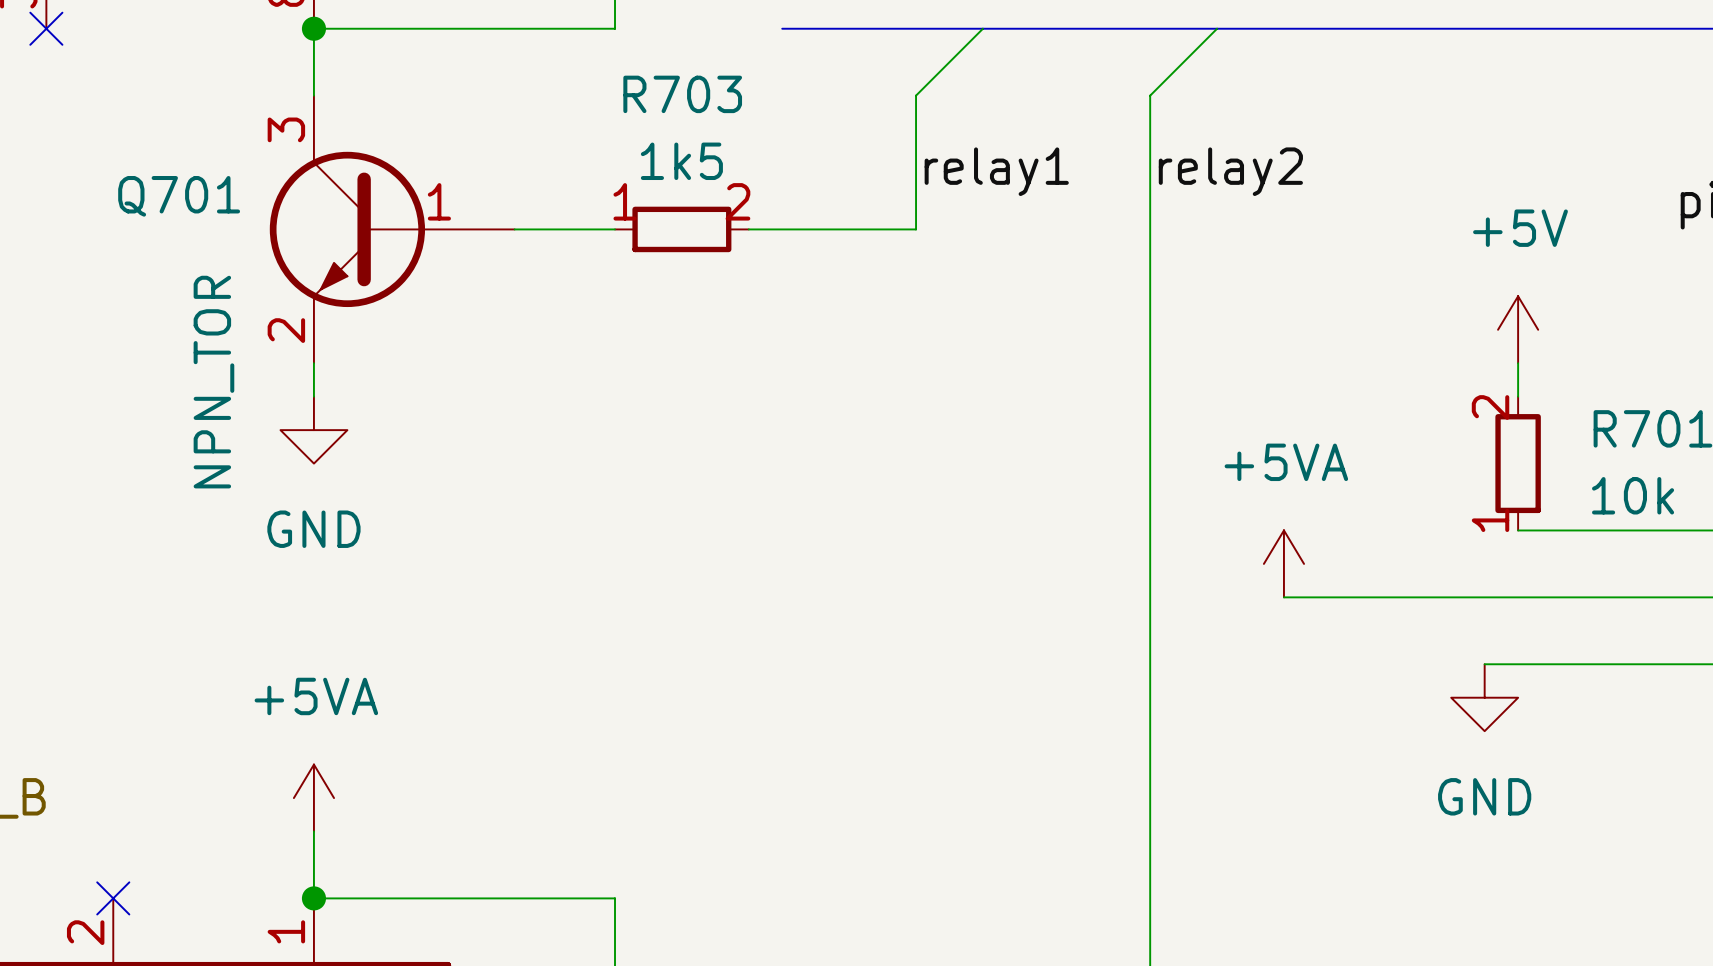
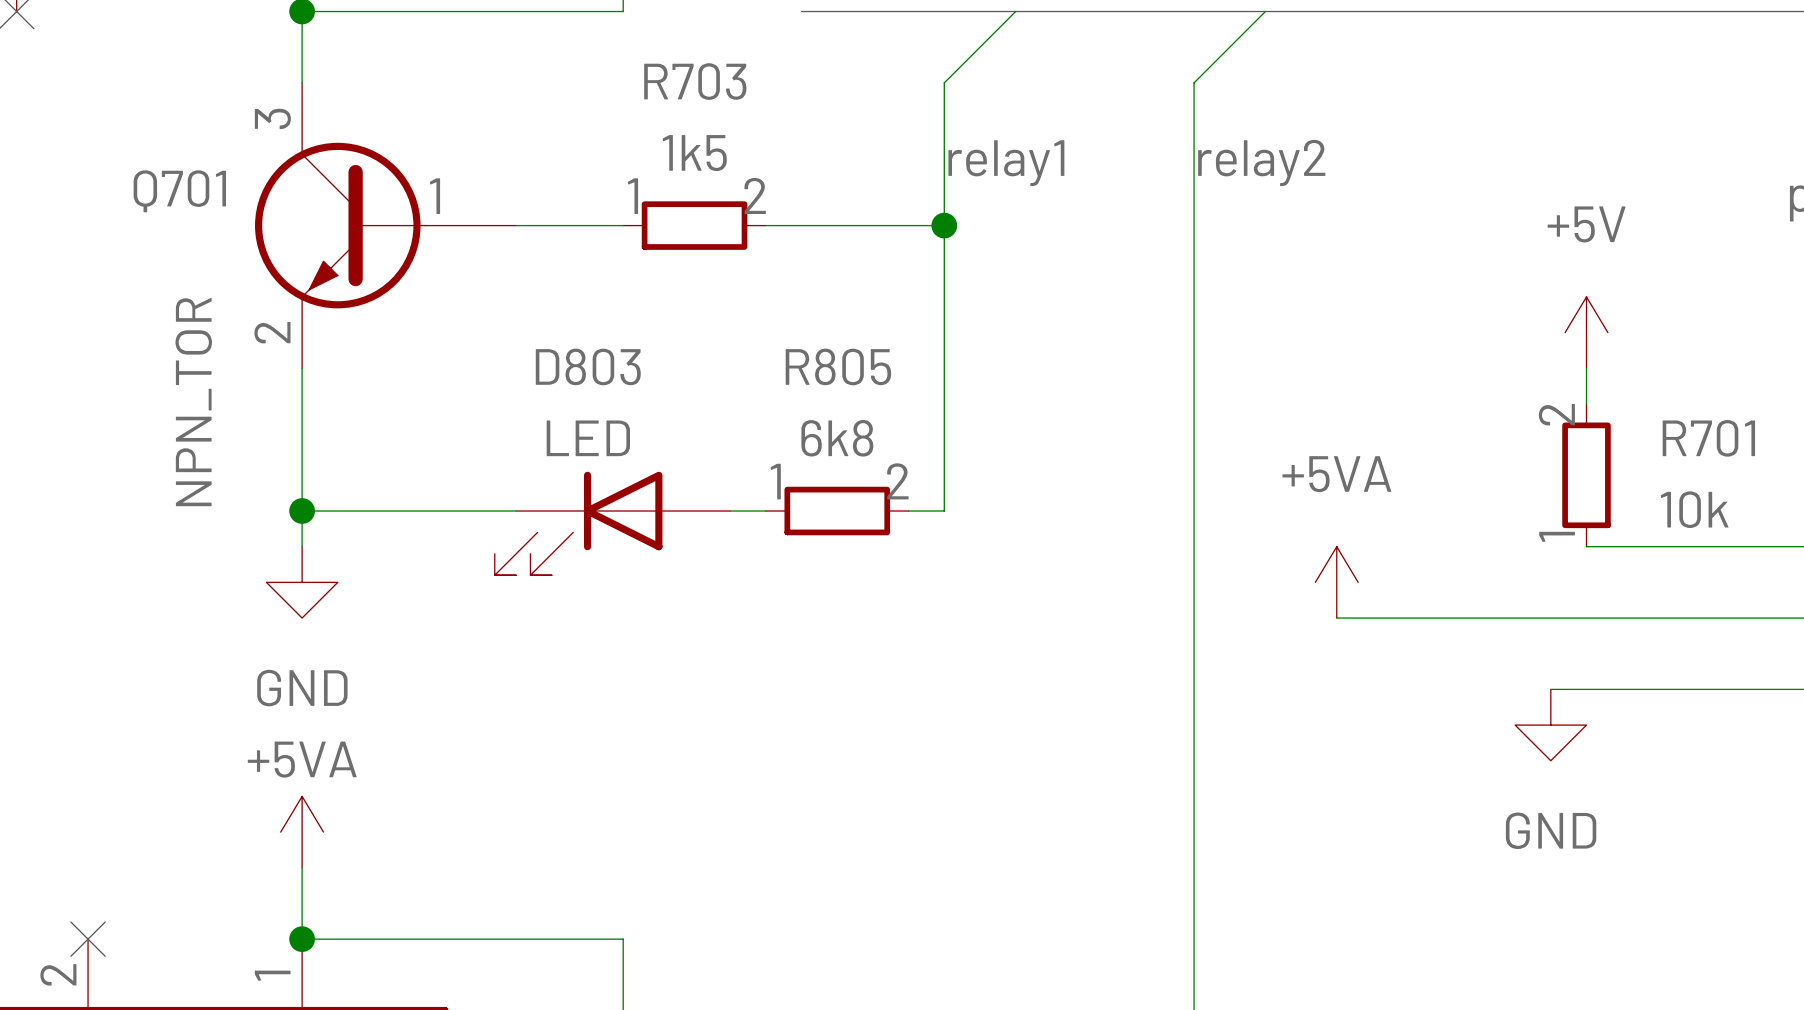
wire: none -> (944, 225) (944, 511) (908, 511)
junction: none -> (944, 225)
wire: none -> (302, 403) (302, 546)
power symbol position: GND (313, 430) -> GND (302, 582)
wire: none -> (302, 511) (516, 511)
junction: none -> (302, 511)
wire: none -> (730, 511) (765, 511)
R805: none -> 6k8 (837, 511)
D803: none -> LED (612, 523)
power symbol text position: +5VA (316, 696) -> +5VA (302, 759)

